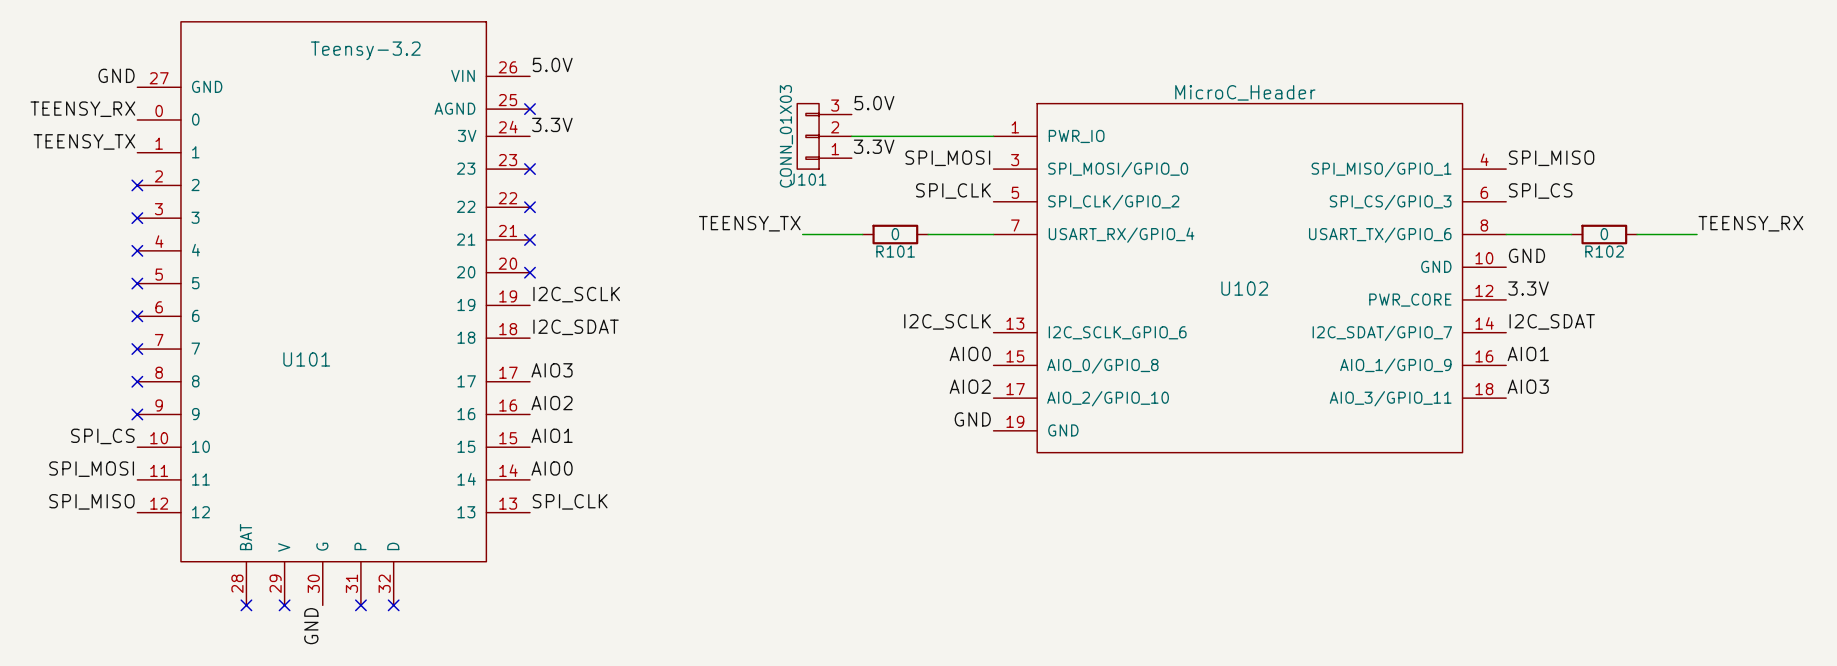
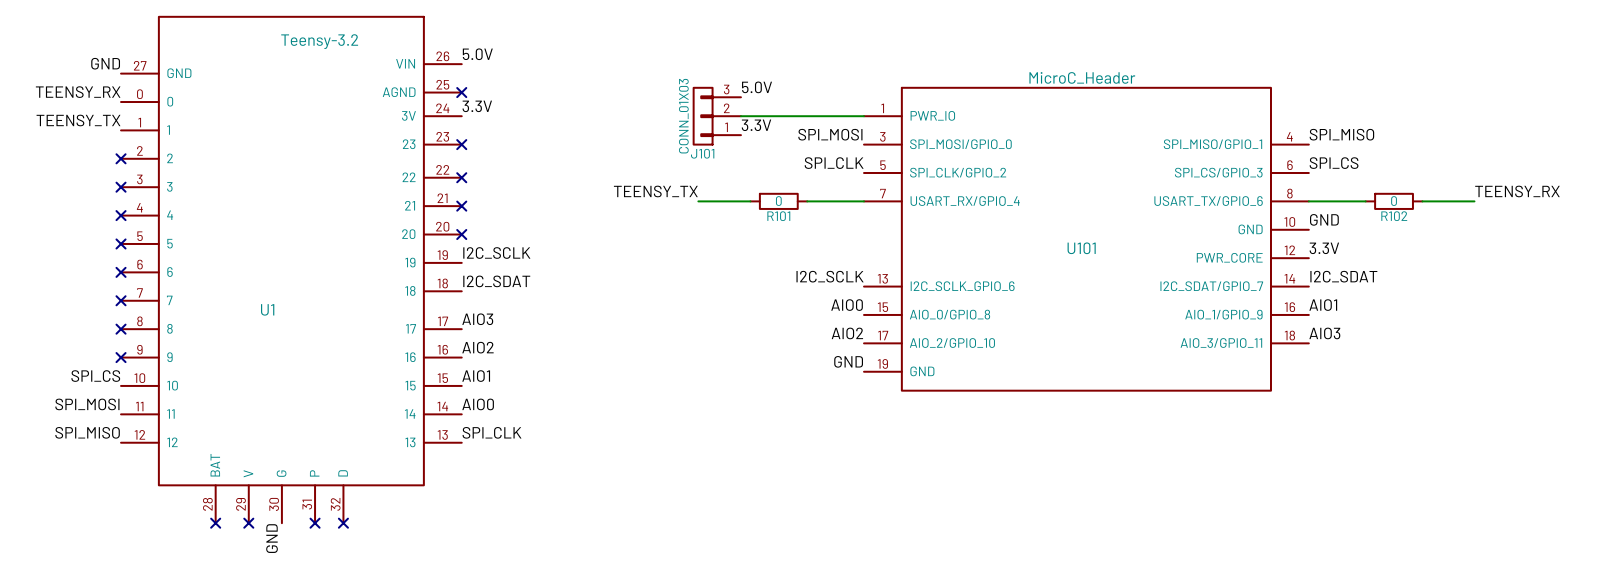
U102 name: U102 (1244, 288) -> U101 (1081, 248)
U101 name: U101 (306, 359) -> U1 (267, 309)

